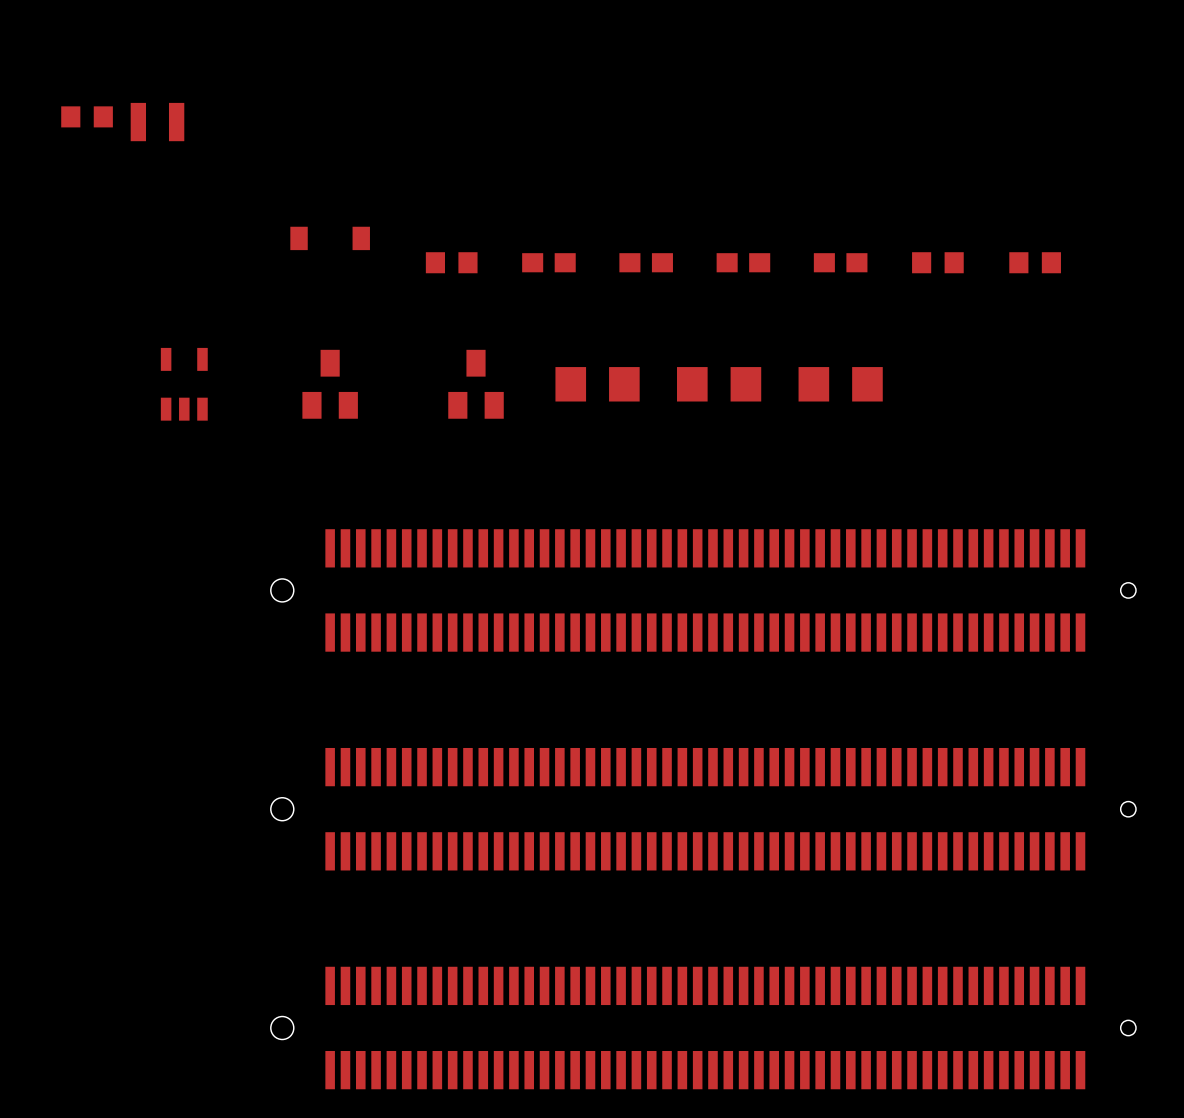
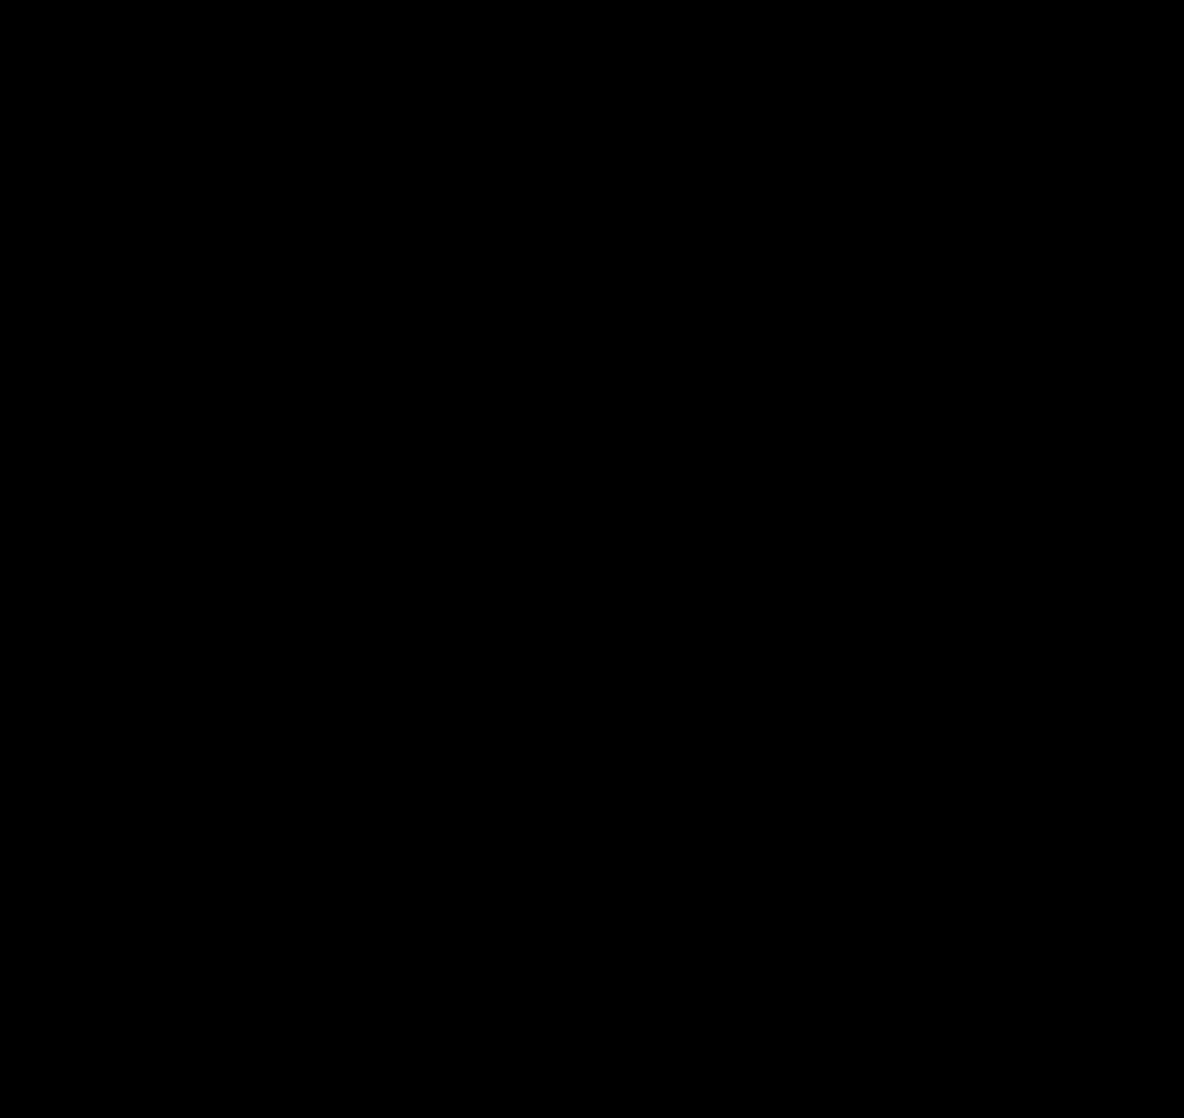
part: (87, 116) -> none
part: (157, 122) -> none
part: (330, 238) -> none
part: (451, 262) -> none
part: (548, 262) -> none
part: (646, 262) -> none
part: (743, 262) -> none
part: (840, 262) -> none
part: (937, 262) -> none
part: (1035, 262) -> none
part: (184, 384) -> none
part: (330, 384) -> none
part: (476, 384) -> none
part: (597, 384) -> none
part: (719, 384) -> none
part: (840, 384) -> none
part: (703, 590) -> none
part: (703, 809) -> none
part: (703, 1028) -> none

